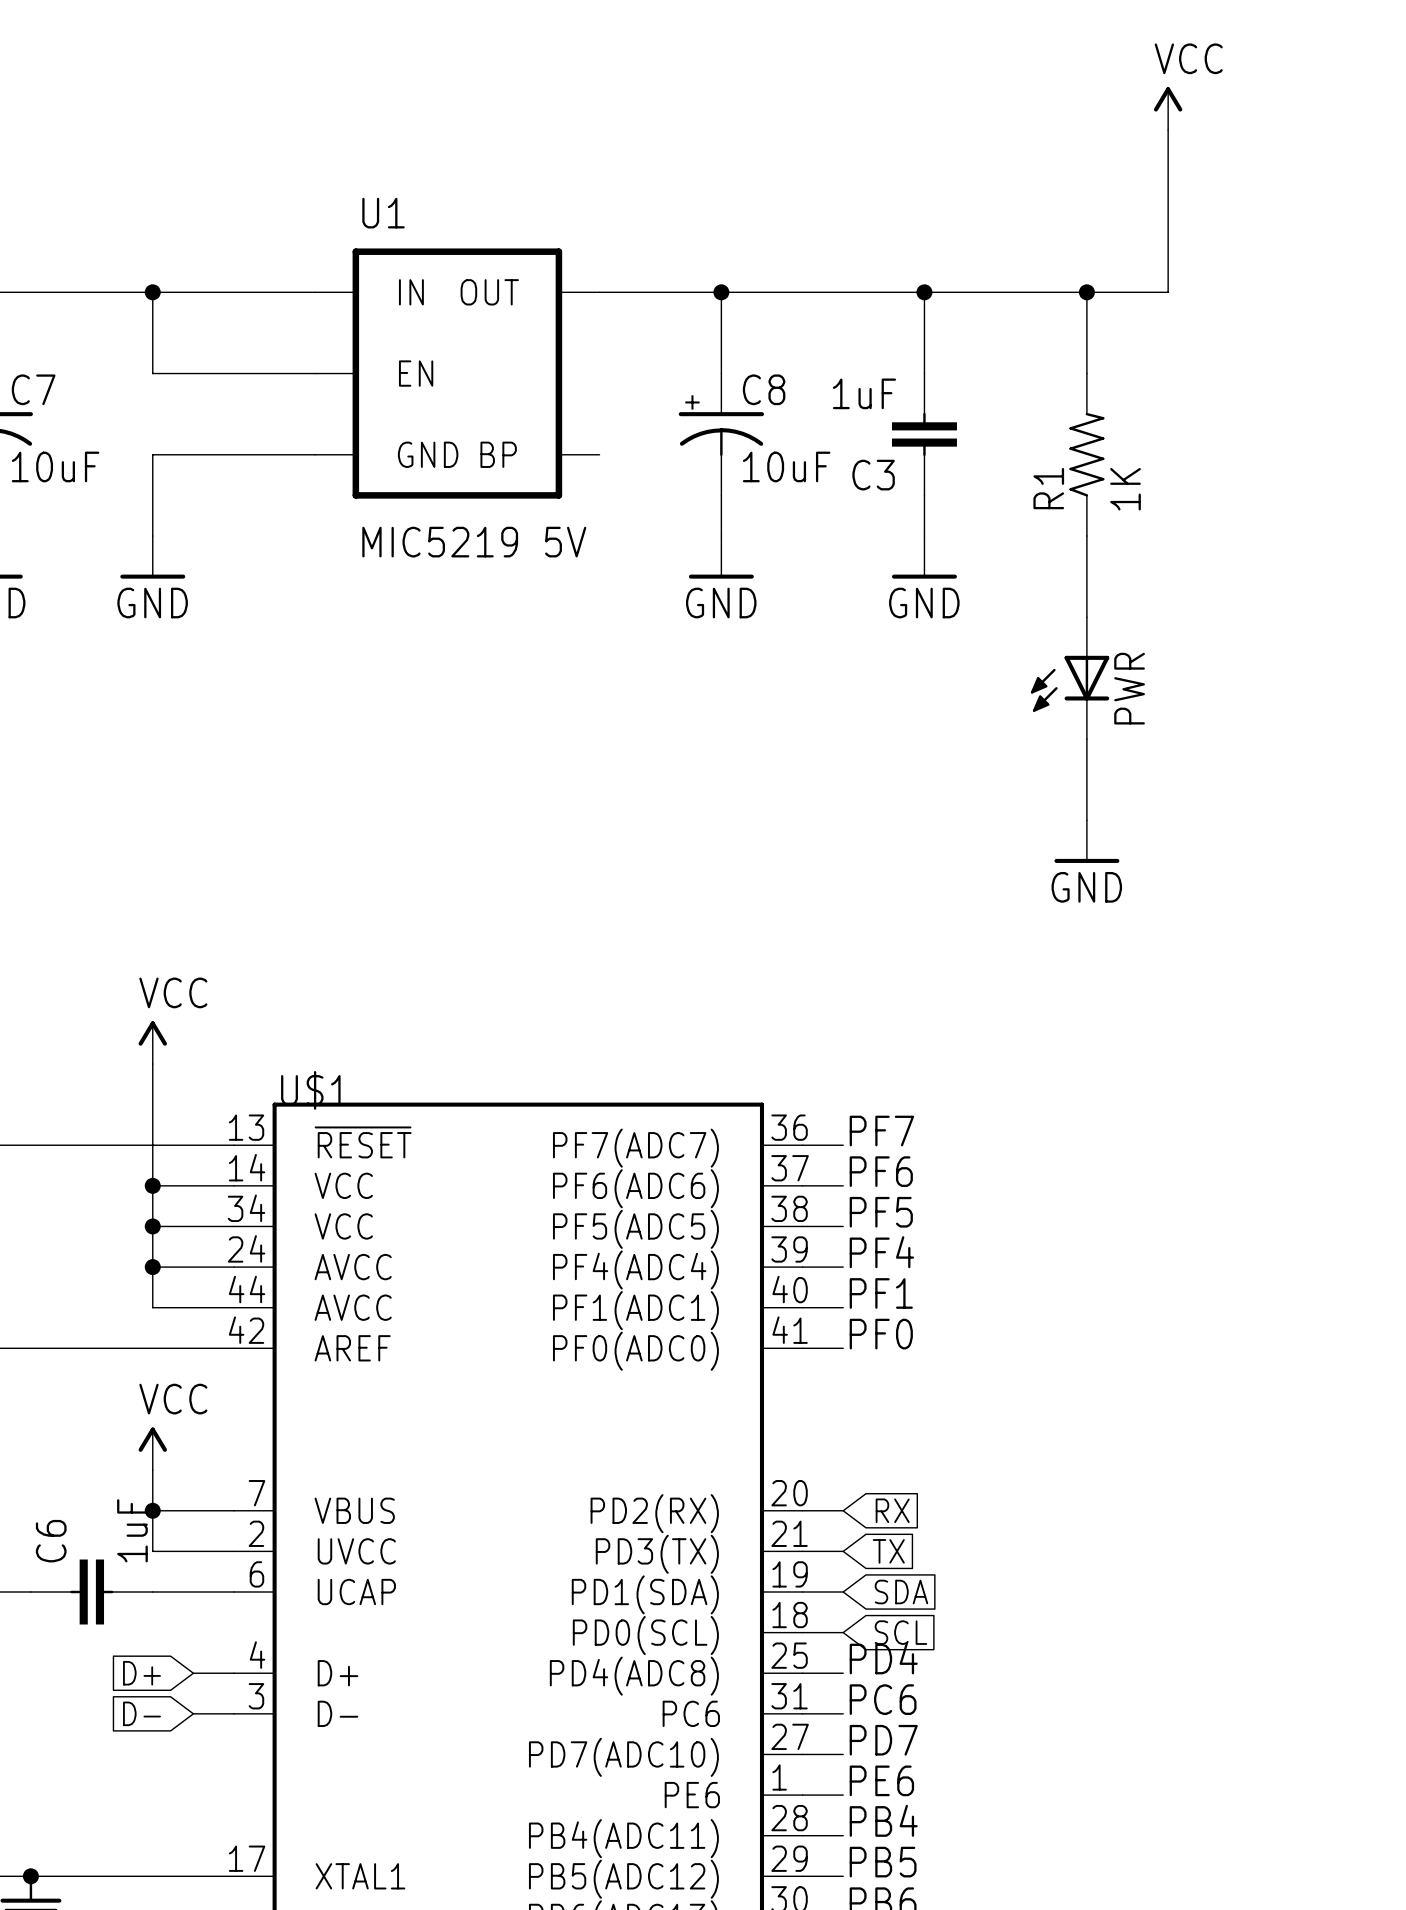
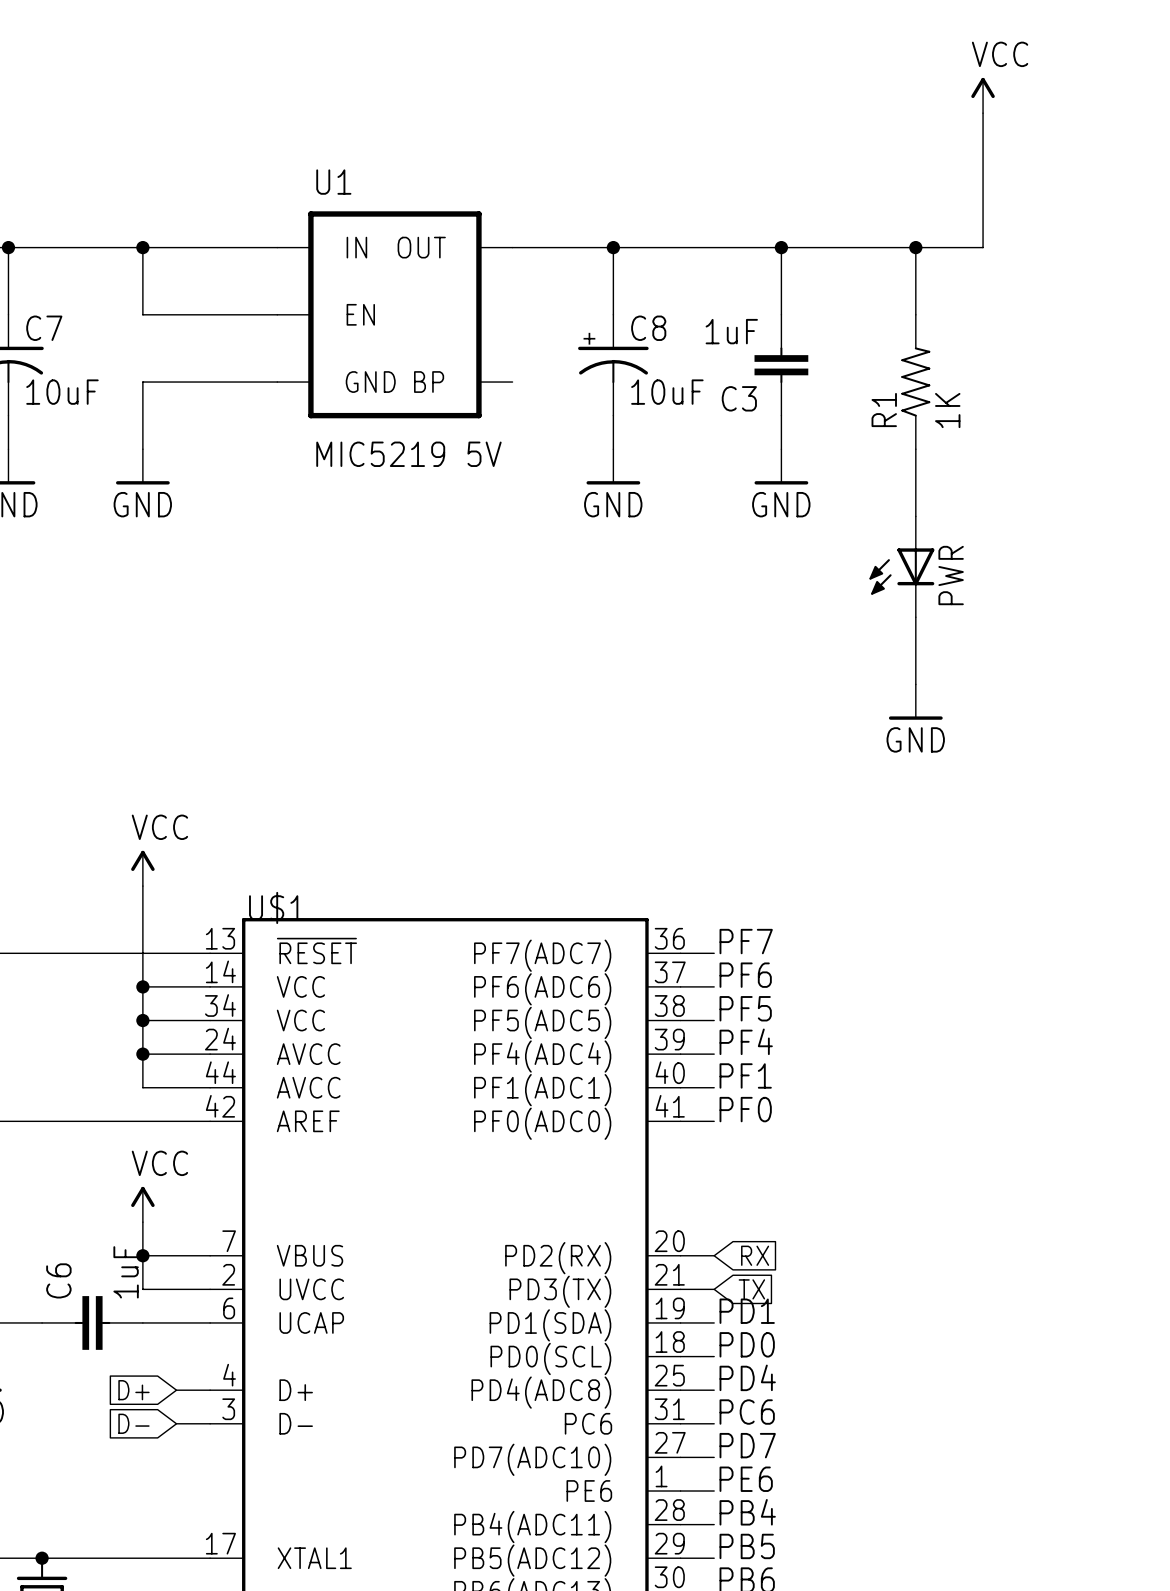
label: none -> PD1 (747, 1311)
global label: SDA (901, 1592) -> none
label: none -> PD0 (747, 1344)
global label: SCL (900, 1632) -> none

